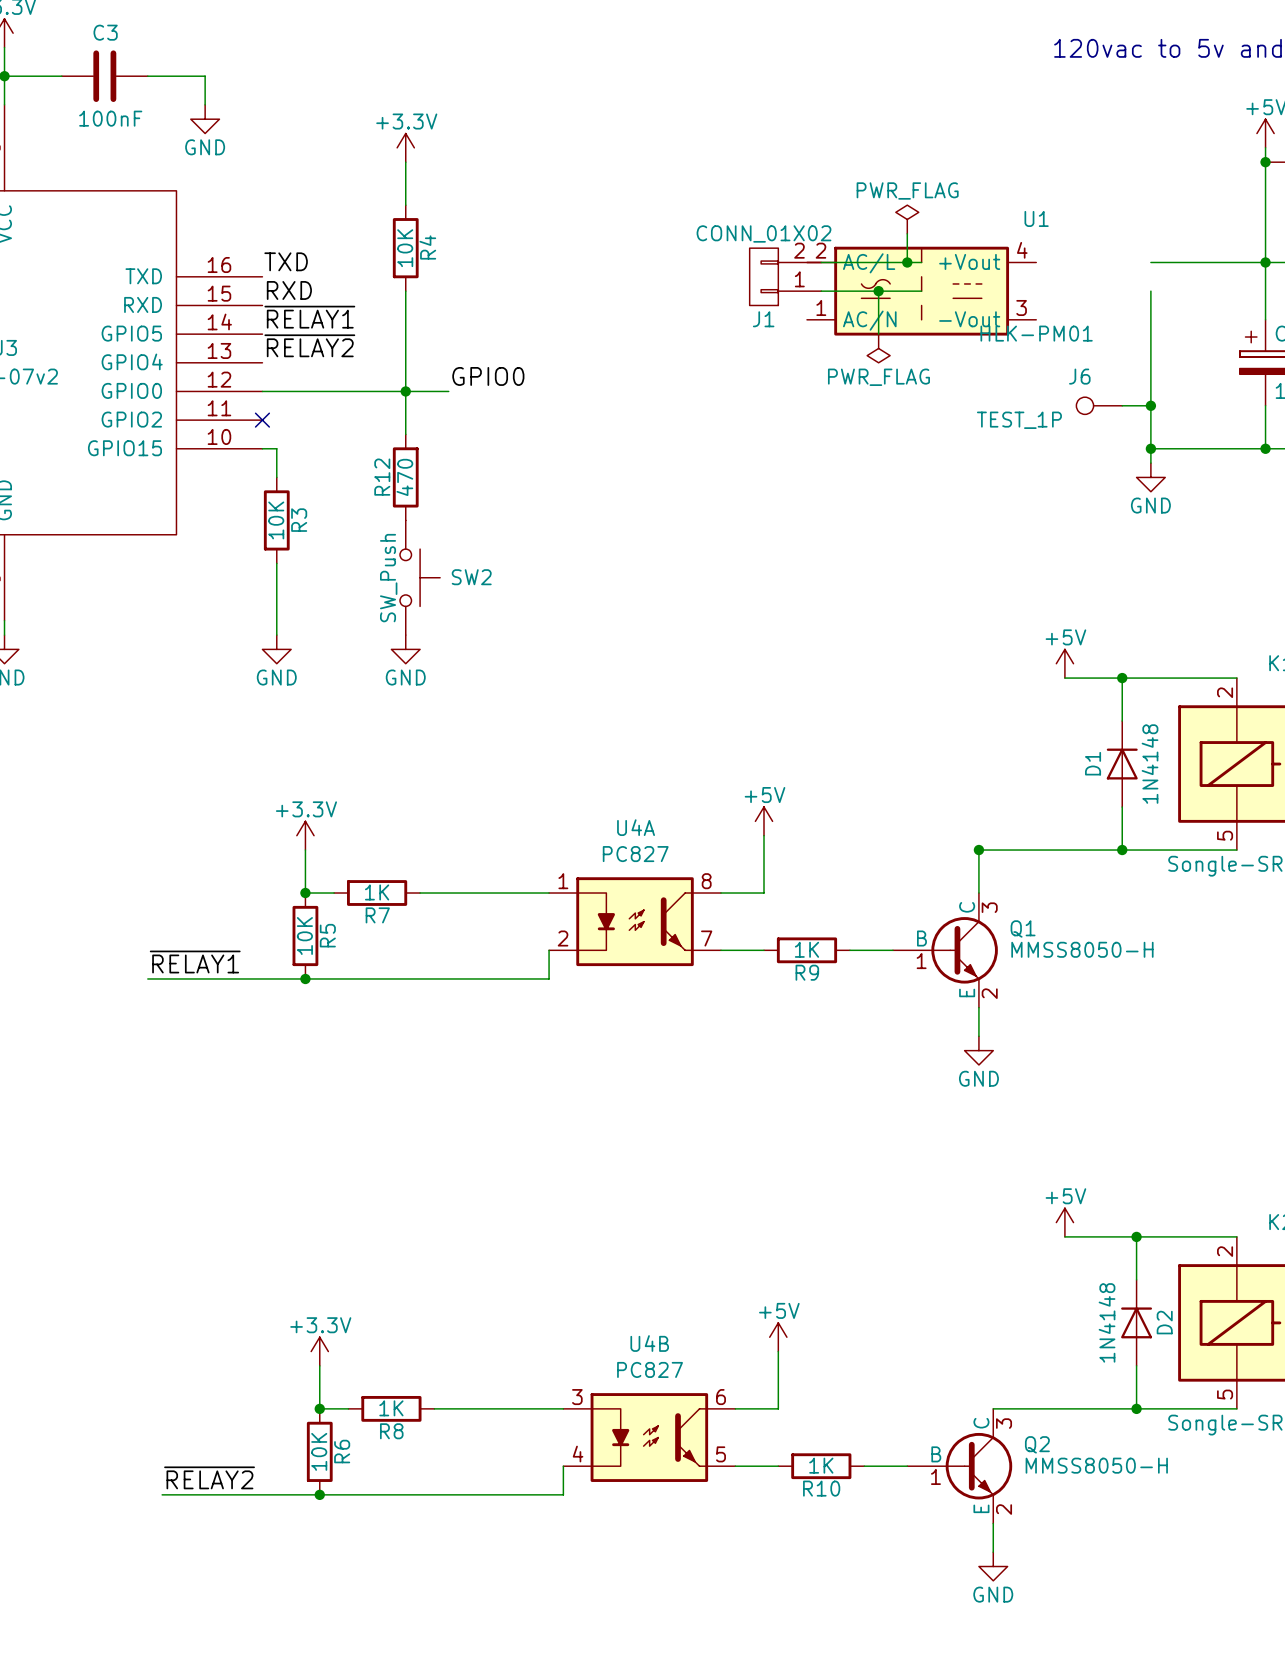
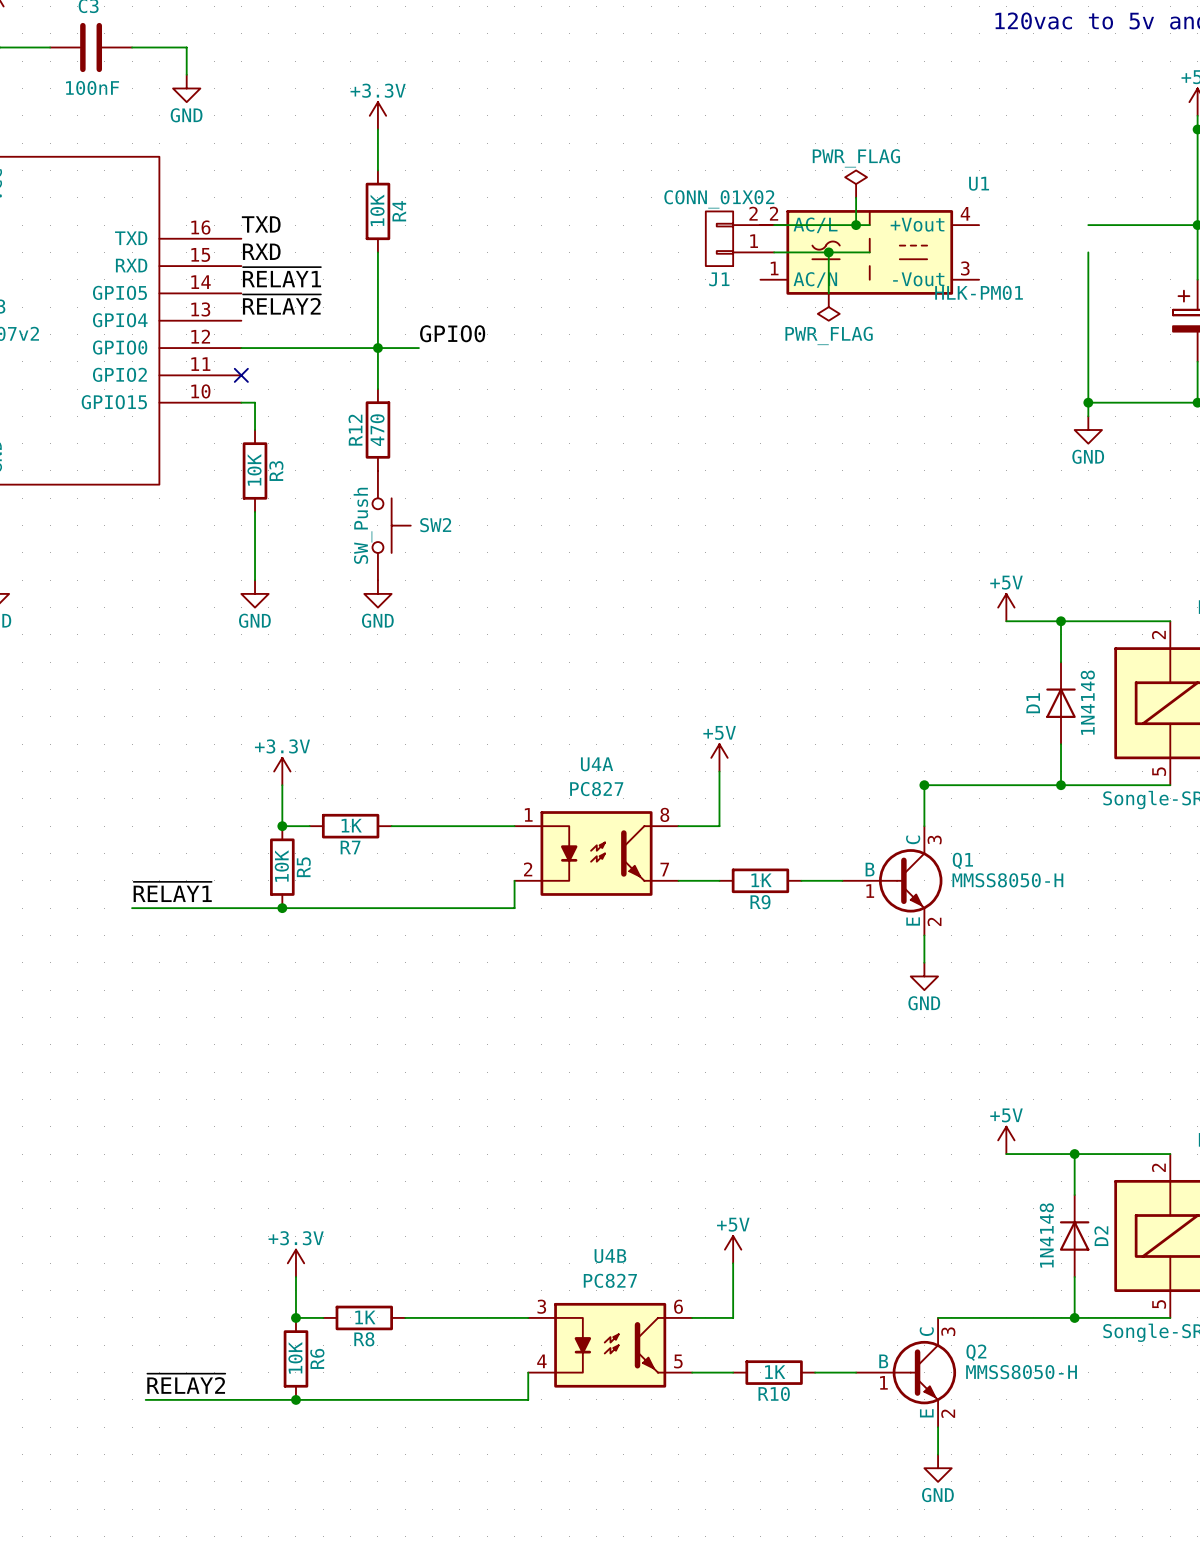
J6: TEST_1P (1099, 405) -> none
wire: (1122, 405) (1150, 405) -> none
junction: (1150, 405) -> none

